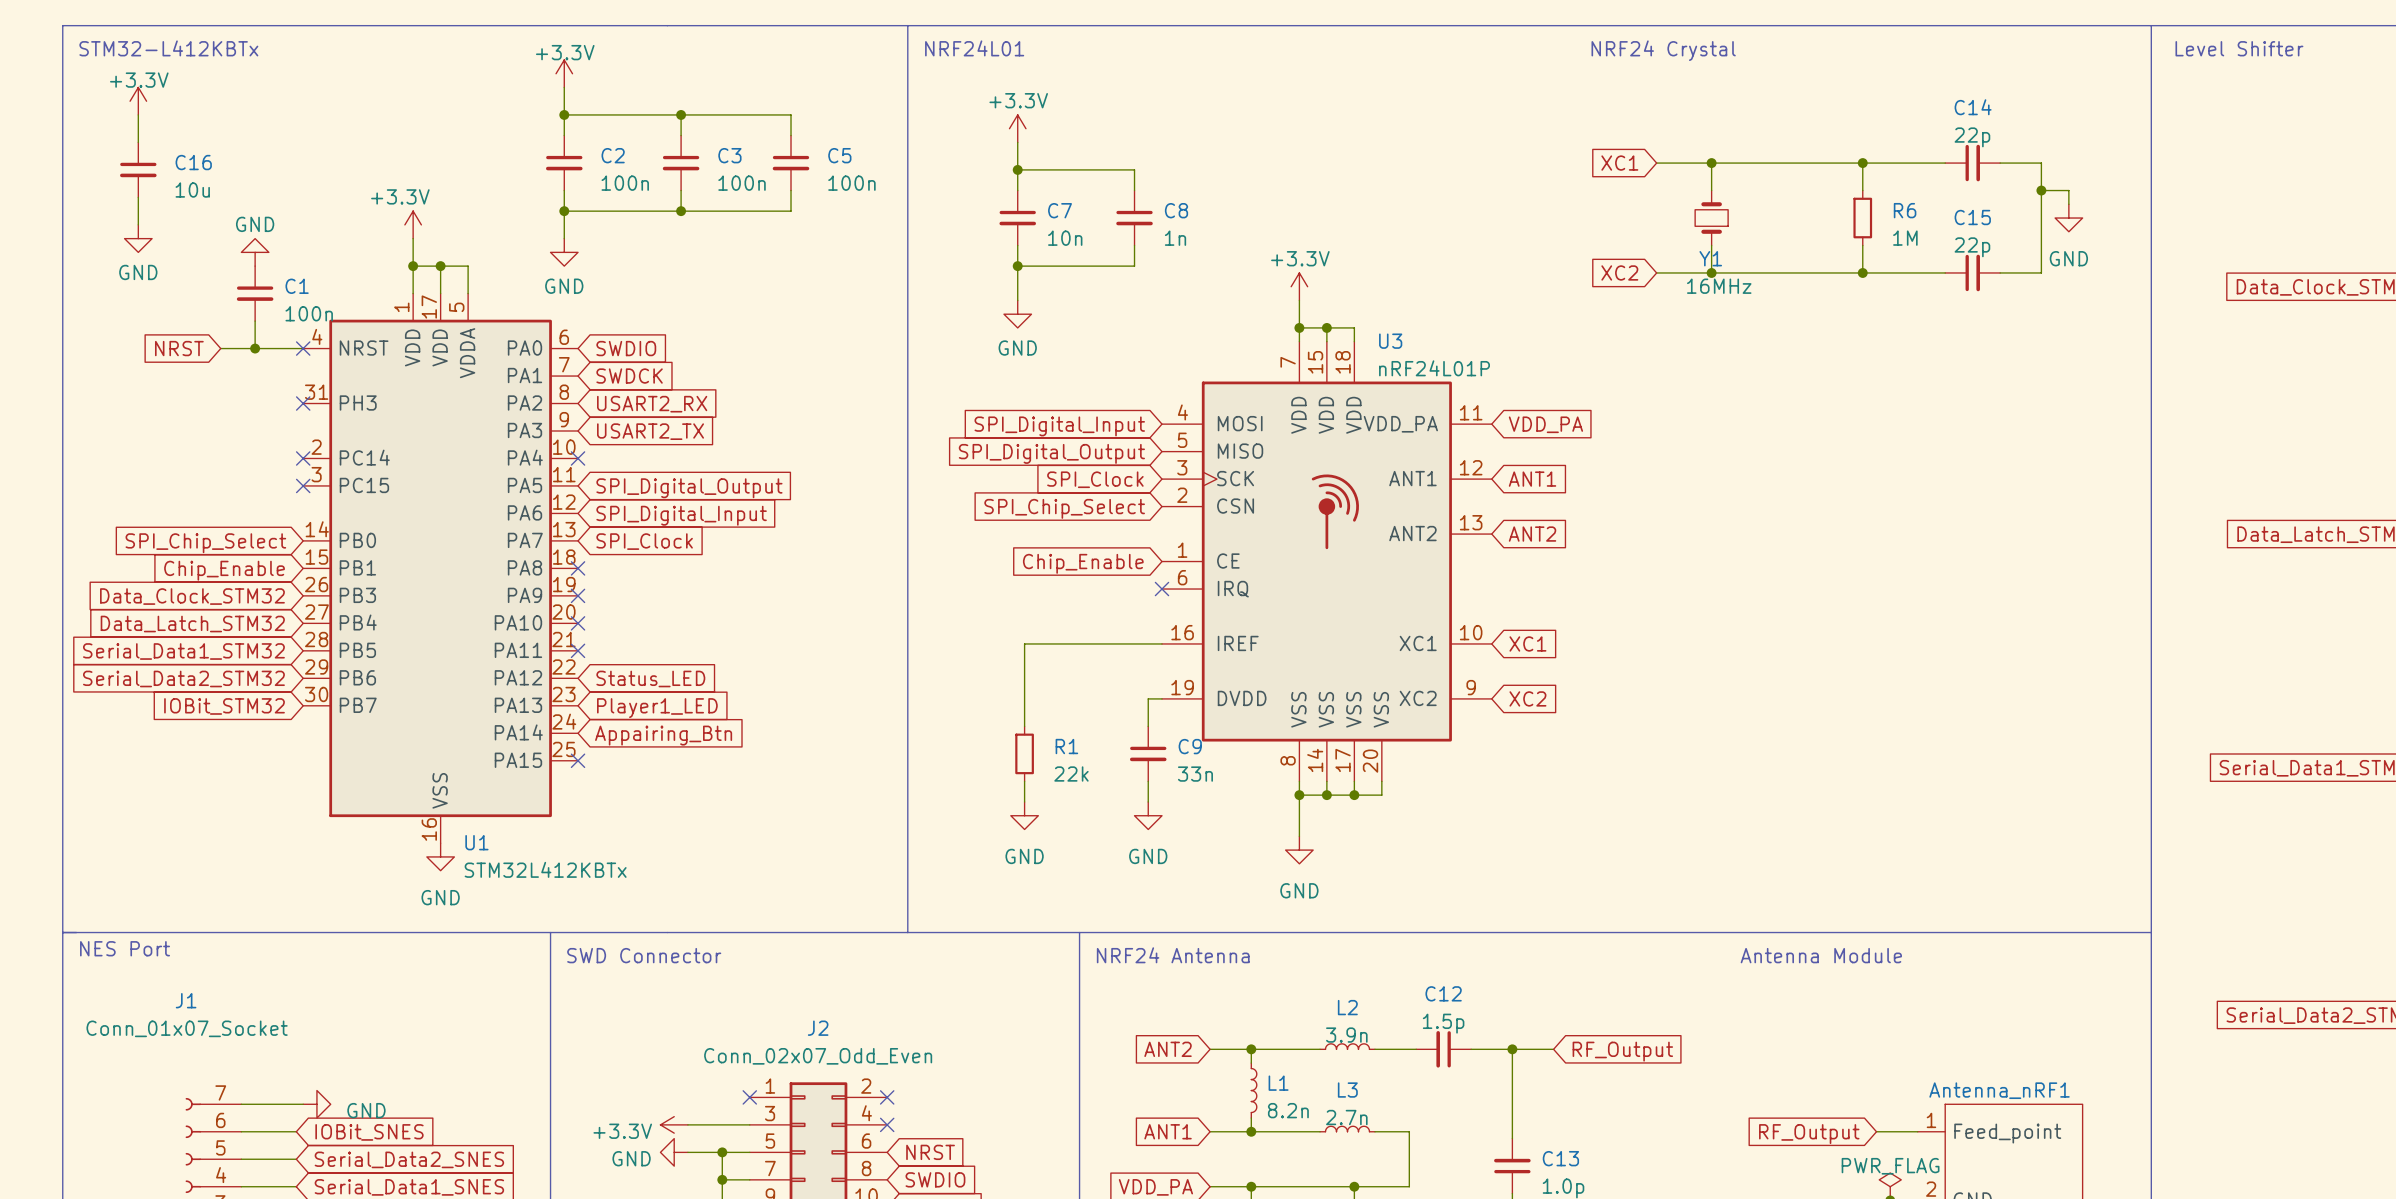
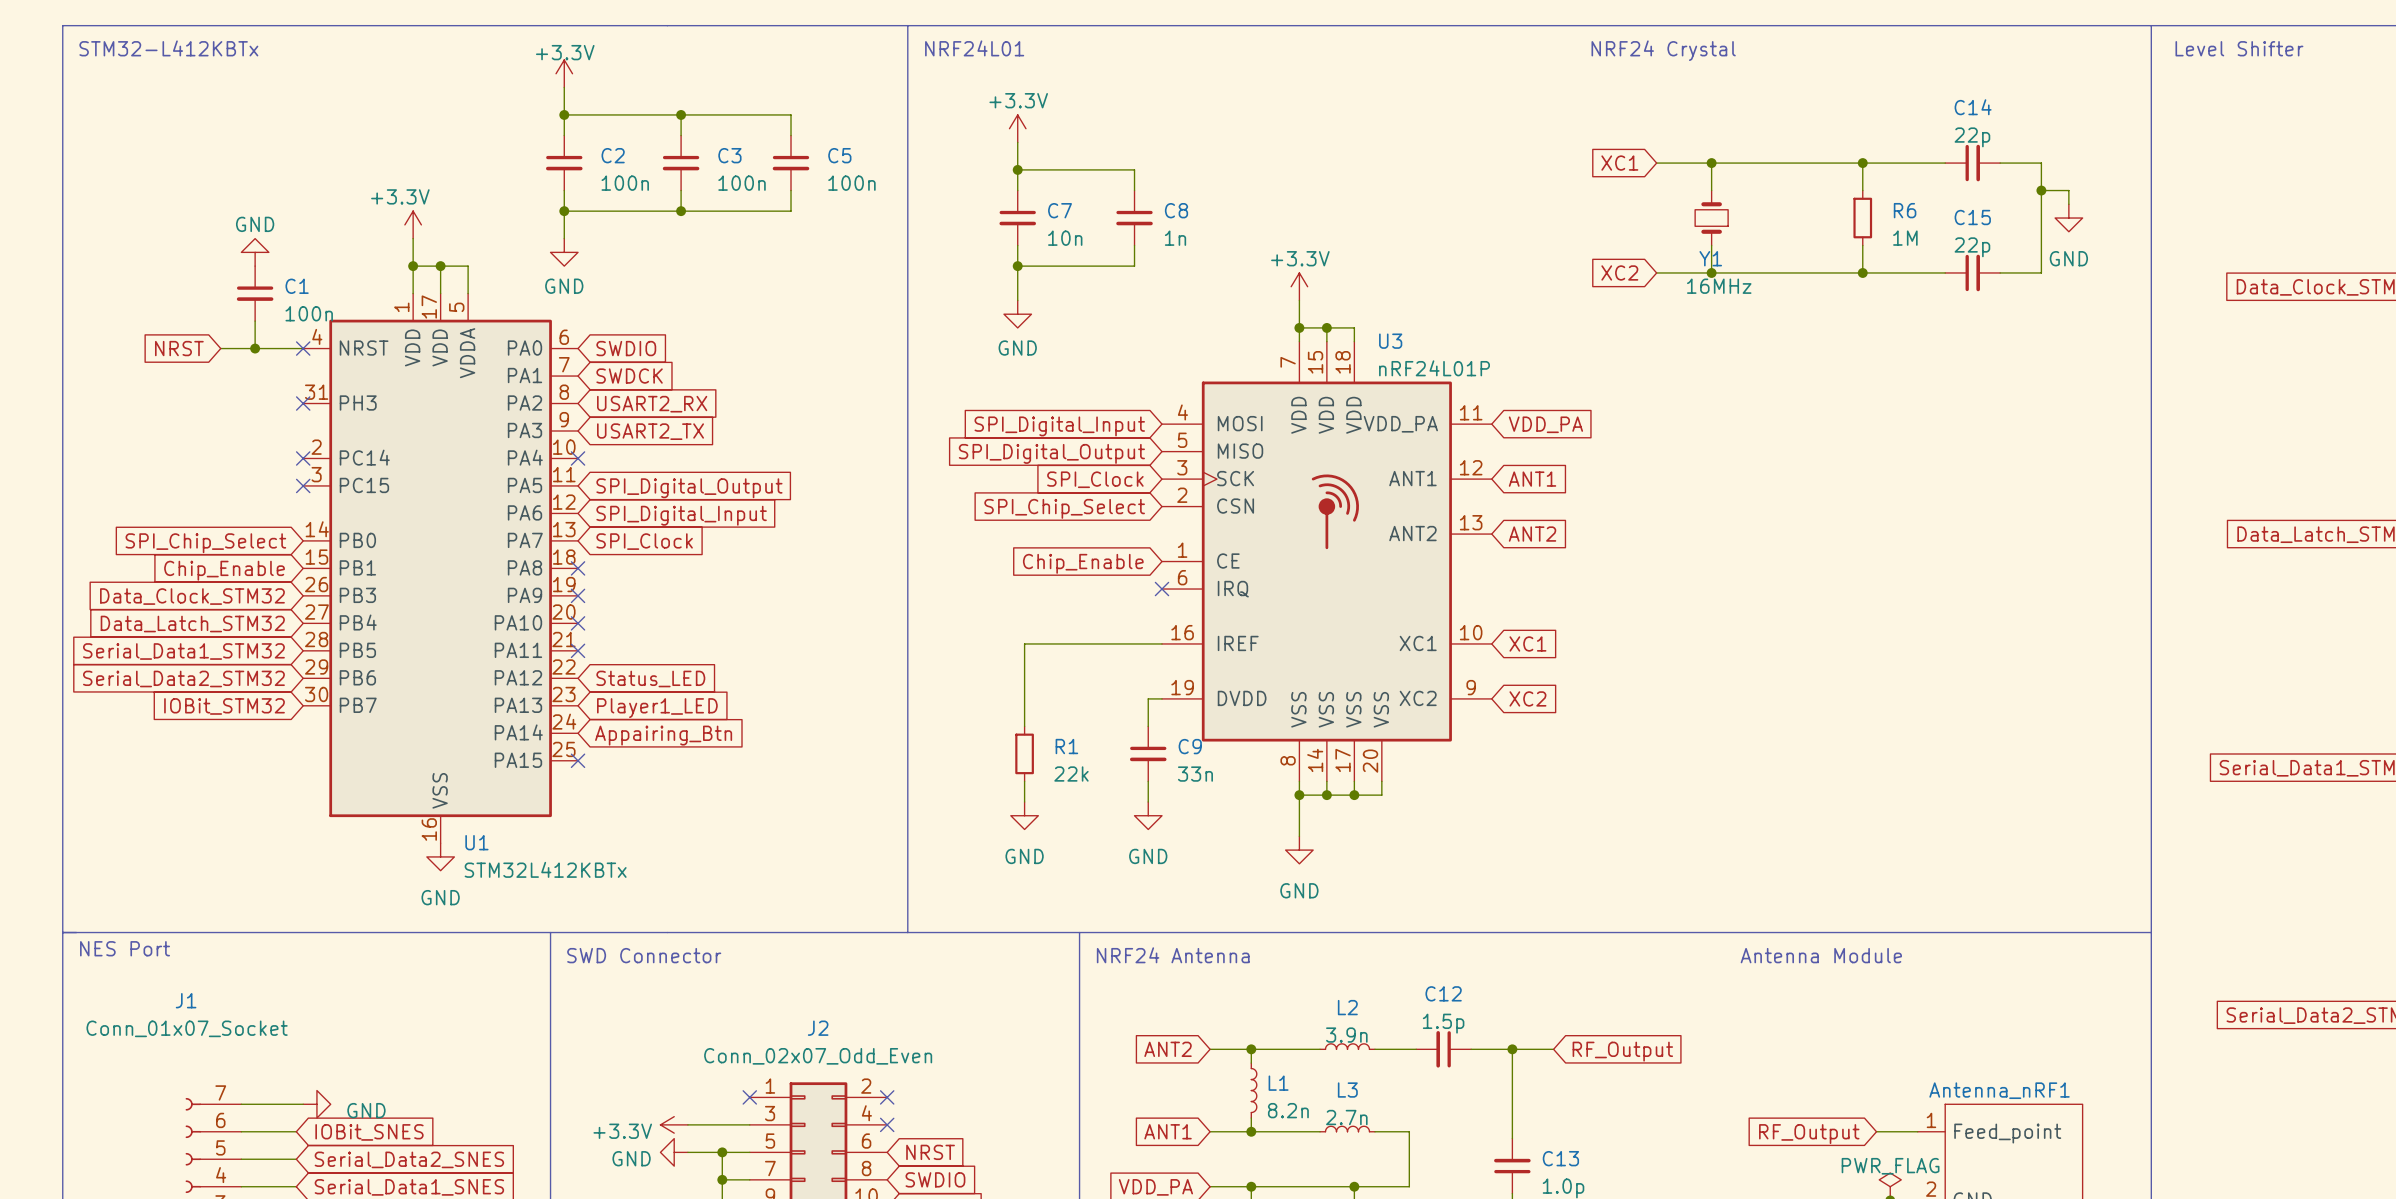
power symbol: +3.3V (138, 101) -> none
wire: (138, 114) (138, 142) -> none
C16: 10u (138, 169) -> none
wire: (138, 197) (138, 224) -> none
power symbol: GND (138, 238) -> none

